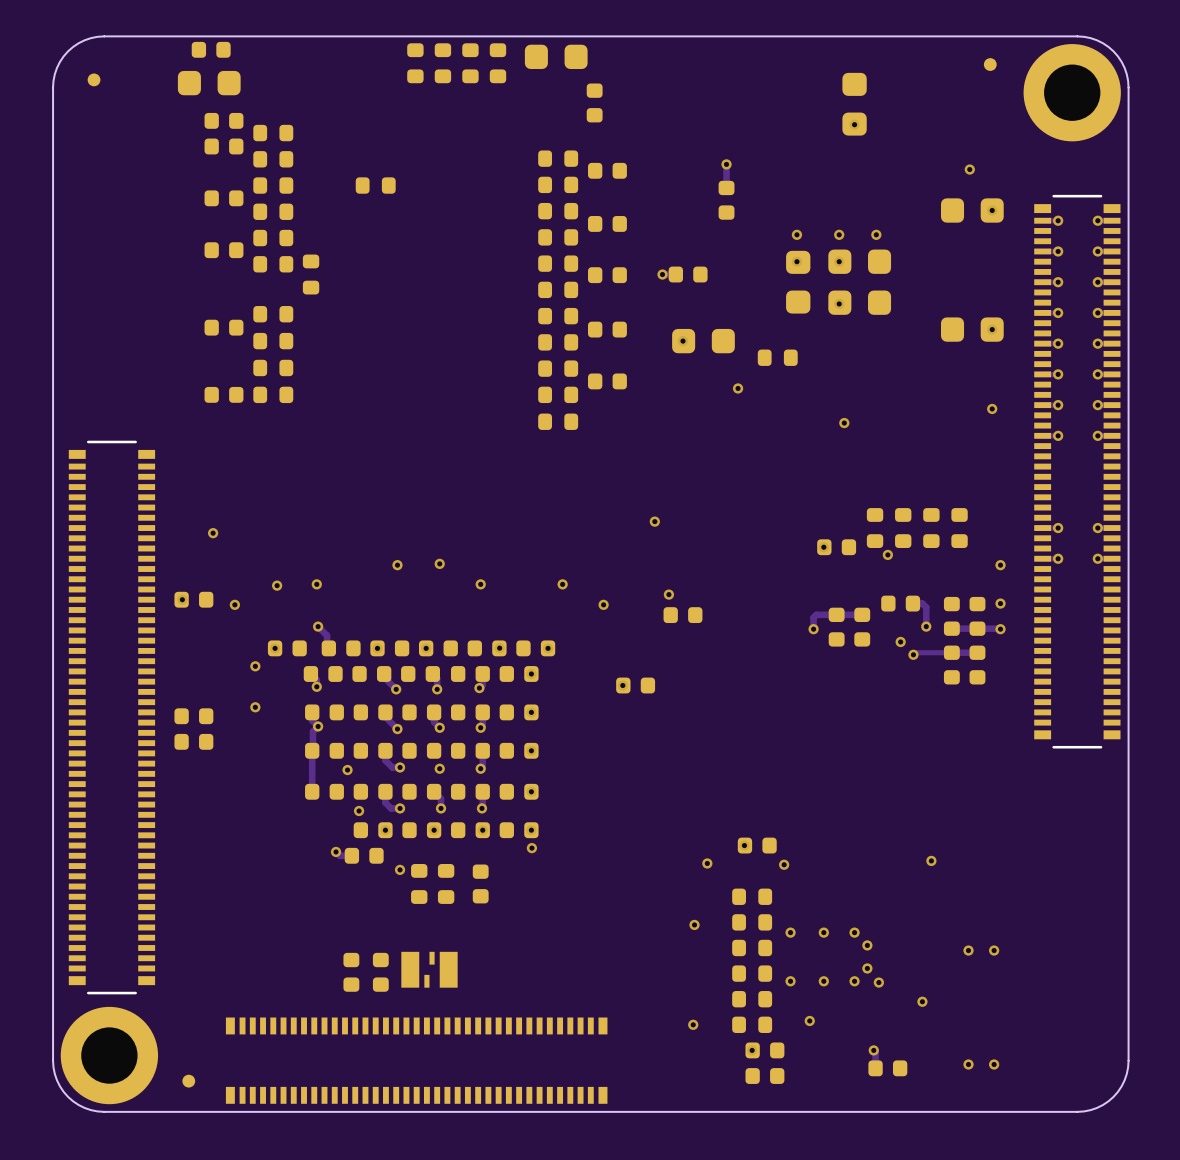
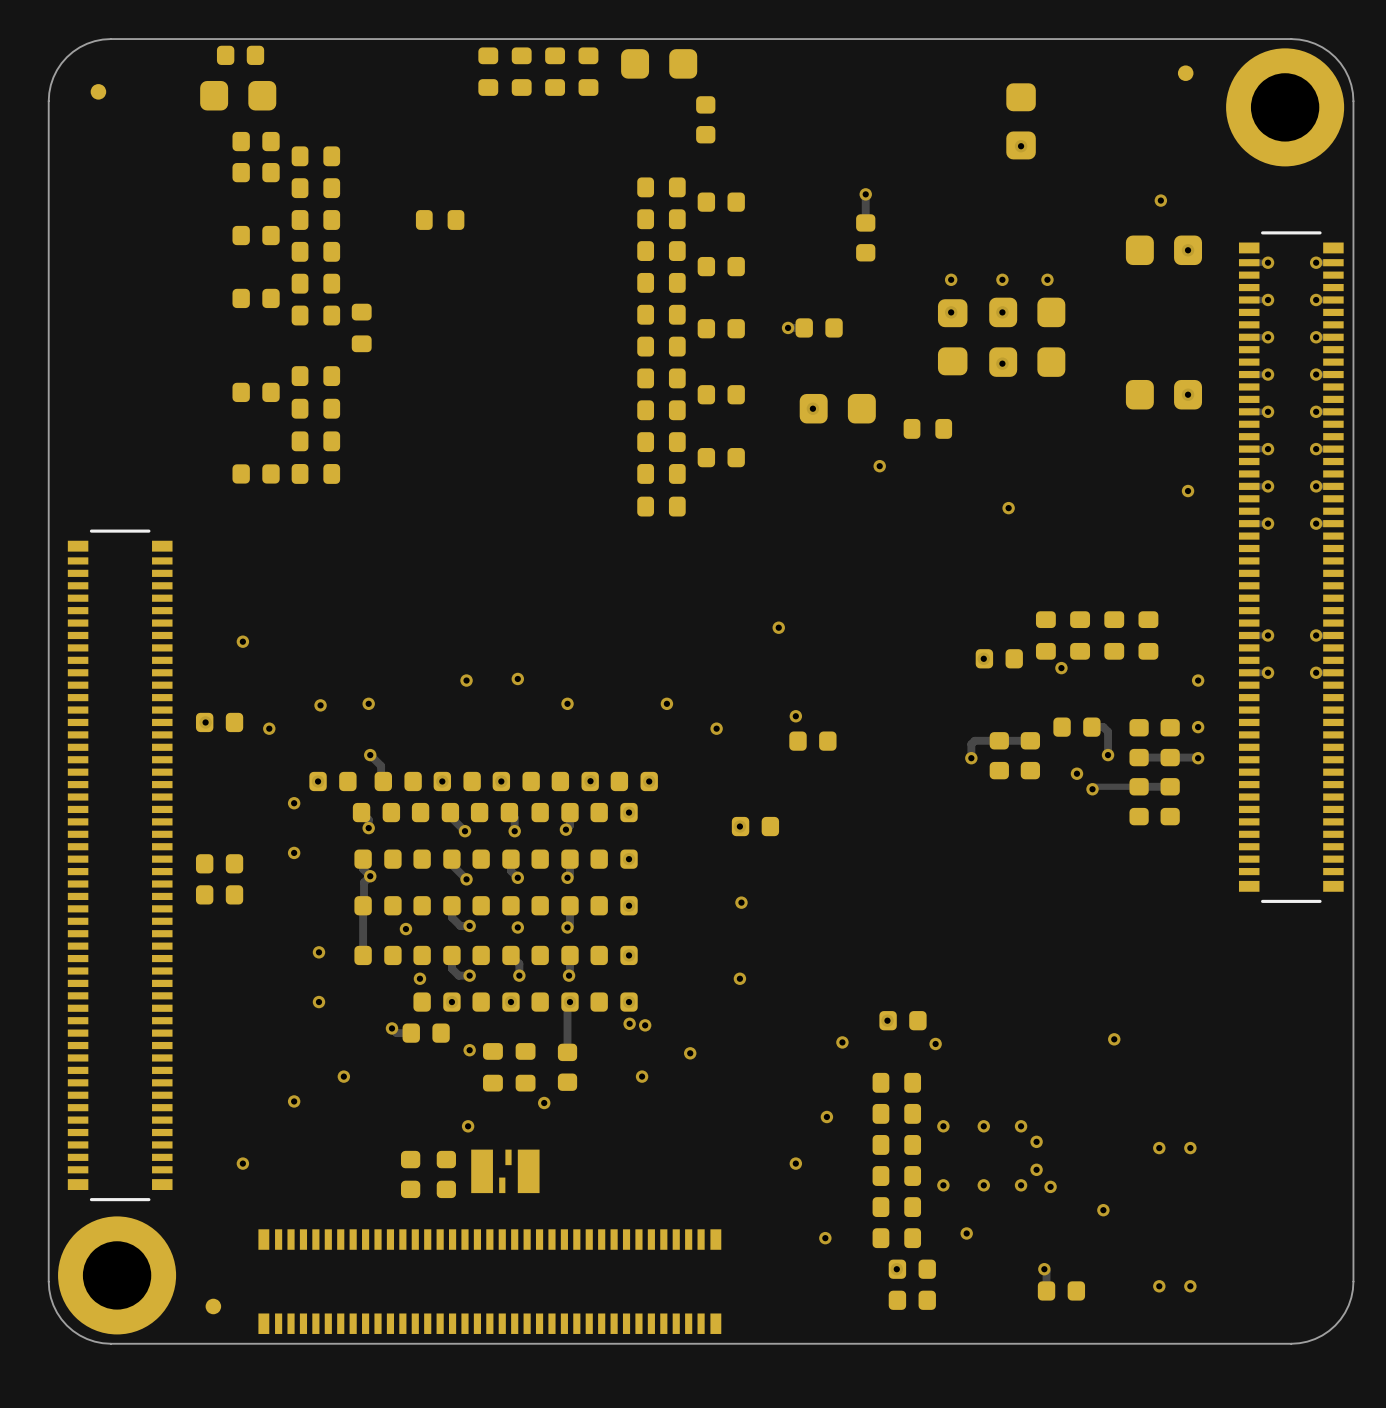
via: none -> (741, 902)
via: none -> (318, 952)
via: none -> (739, 978)
via: none -> (318, 1002)
track: none -> (569, 1002) (567, 1004) (567, 1052)
via: none -> (645, 1025)
via: none -> (690, 1053)
via: none -> (343, 1076)
via: none -> (642, 1076)
via: none -> (294, 1101)
via: none -> (544, 1103)
via: none -> (468, 1126)
via: none -> (242, 1163)
via: none -> (795, 1163)

